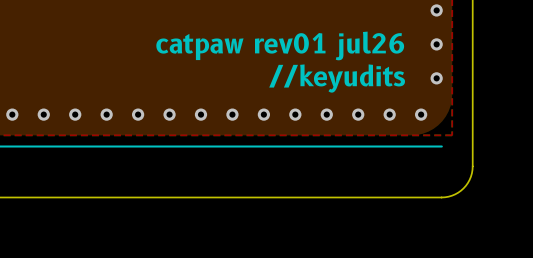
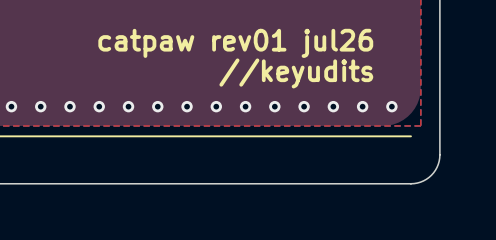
via: (436, 10) -> none
via: (436, 44) -> none
via: (436, 78) -> none

